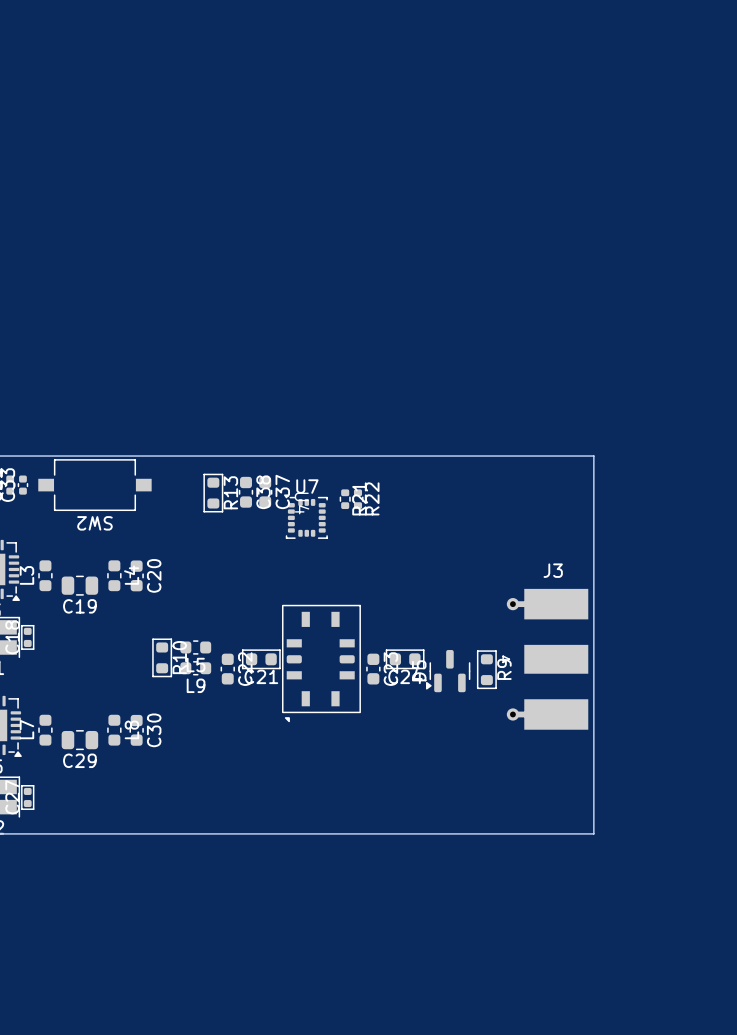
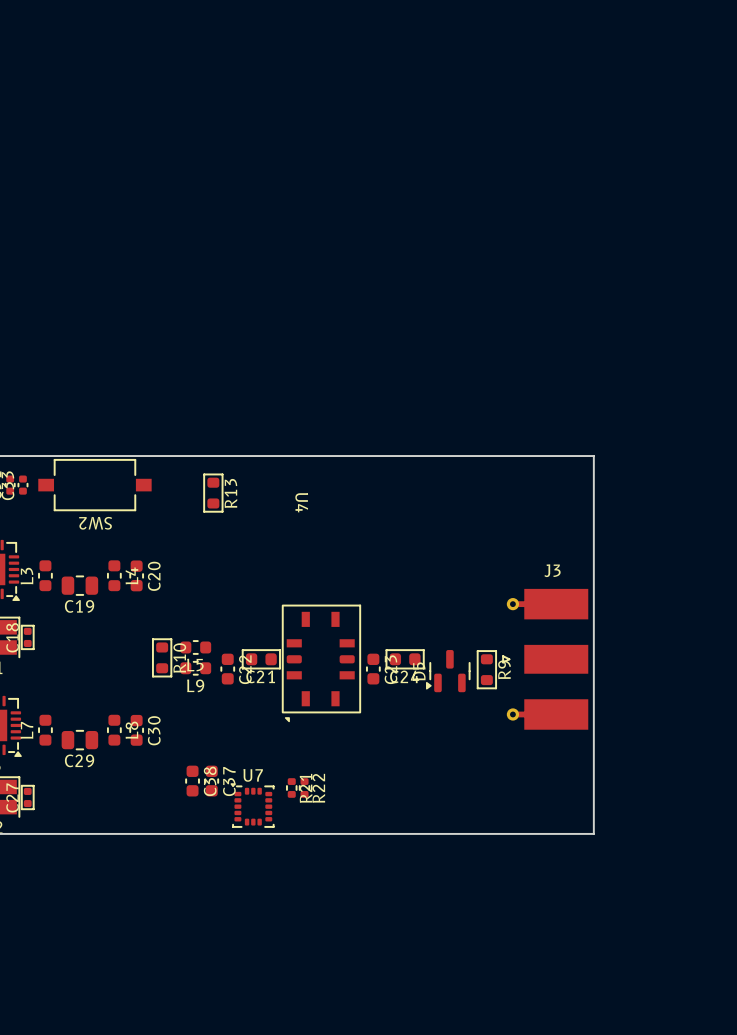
C38 position: (246, 492) -> (192, 781)
C37 position: (265, 492) -> (211, 781)
R21 position: (345, 499) -> (291, 787)
R22 position: (357, 499) -> (304, 787)
U7 position: (305, 516) -> (252, 805)

